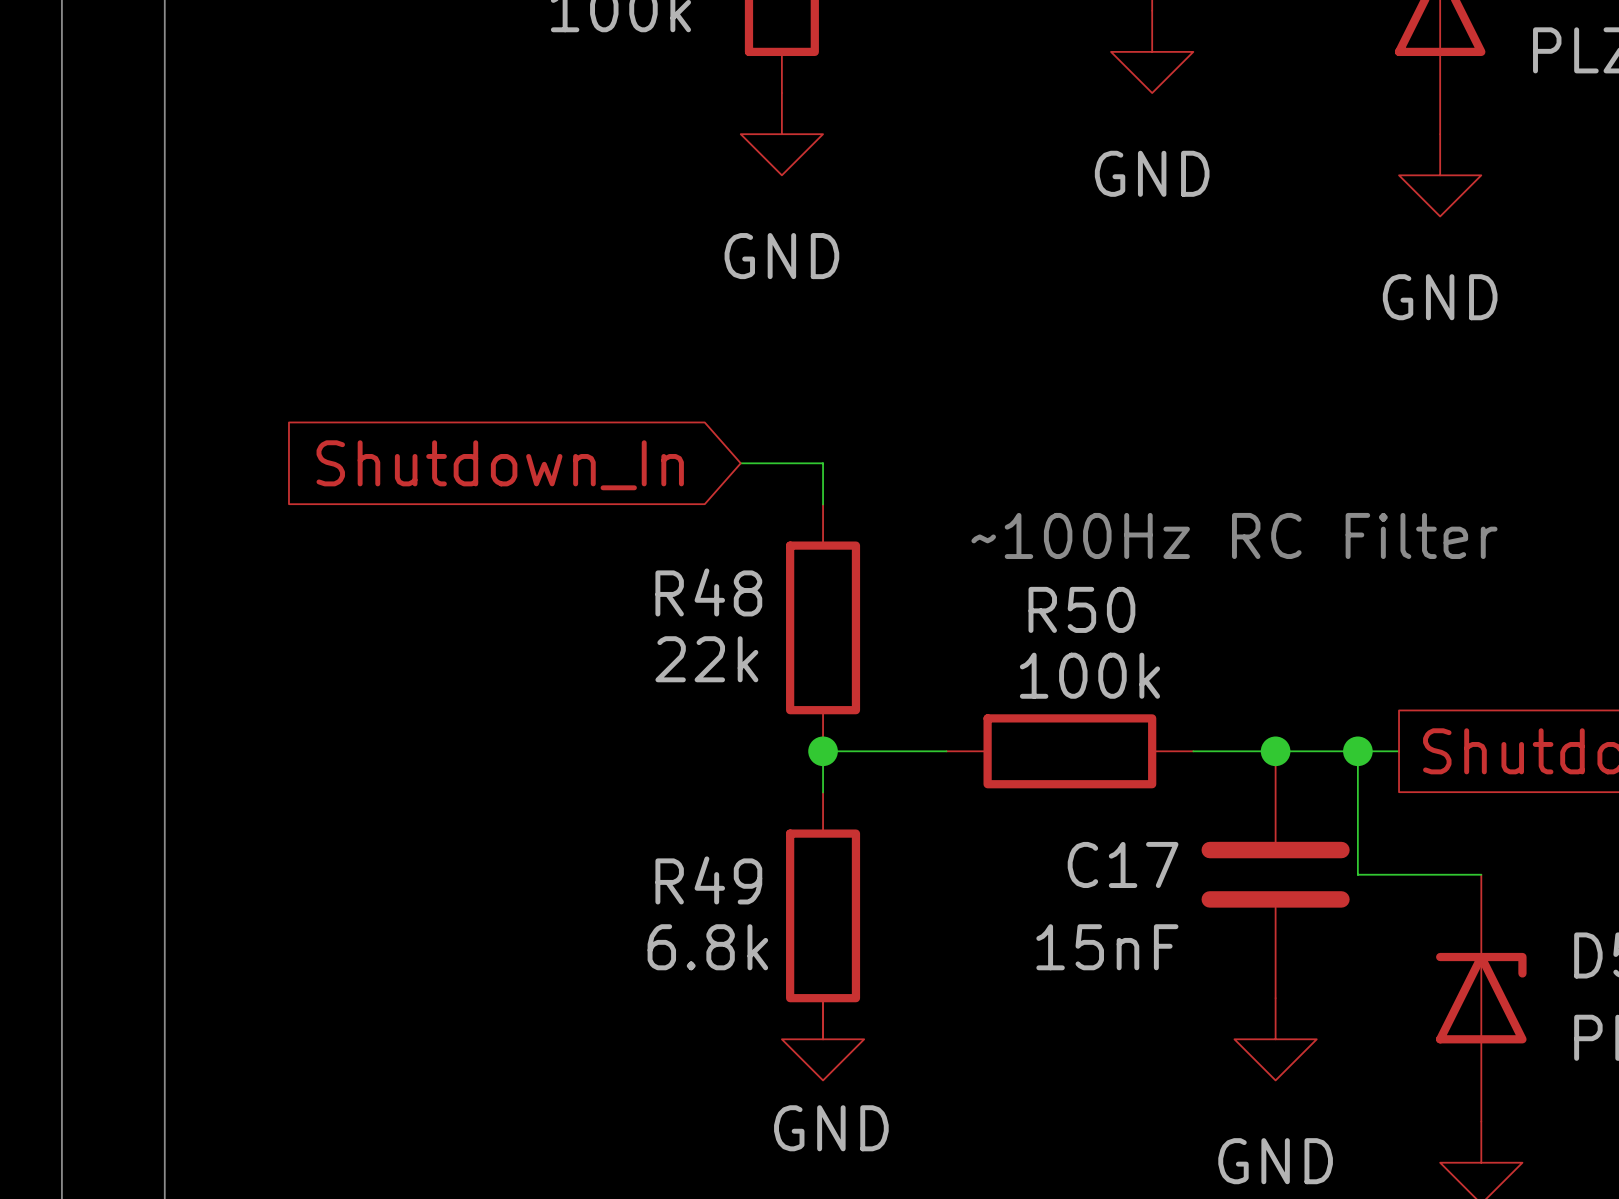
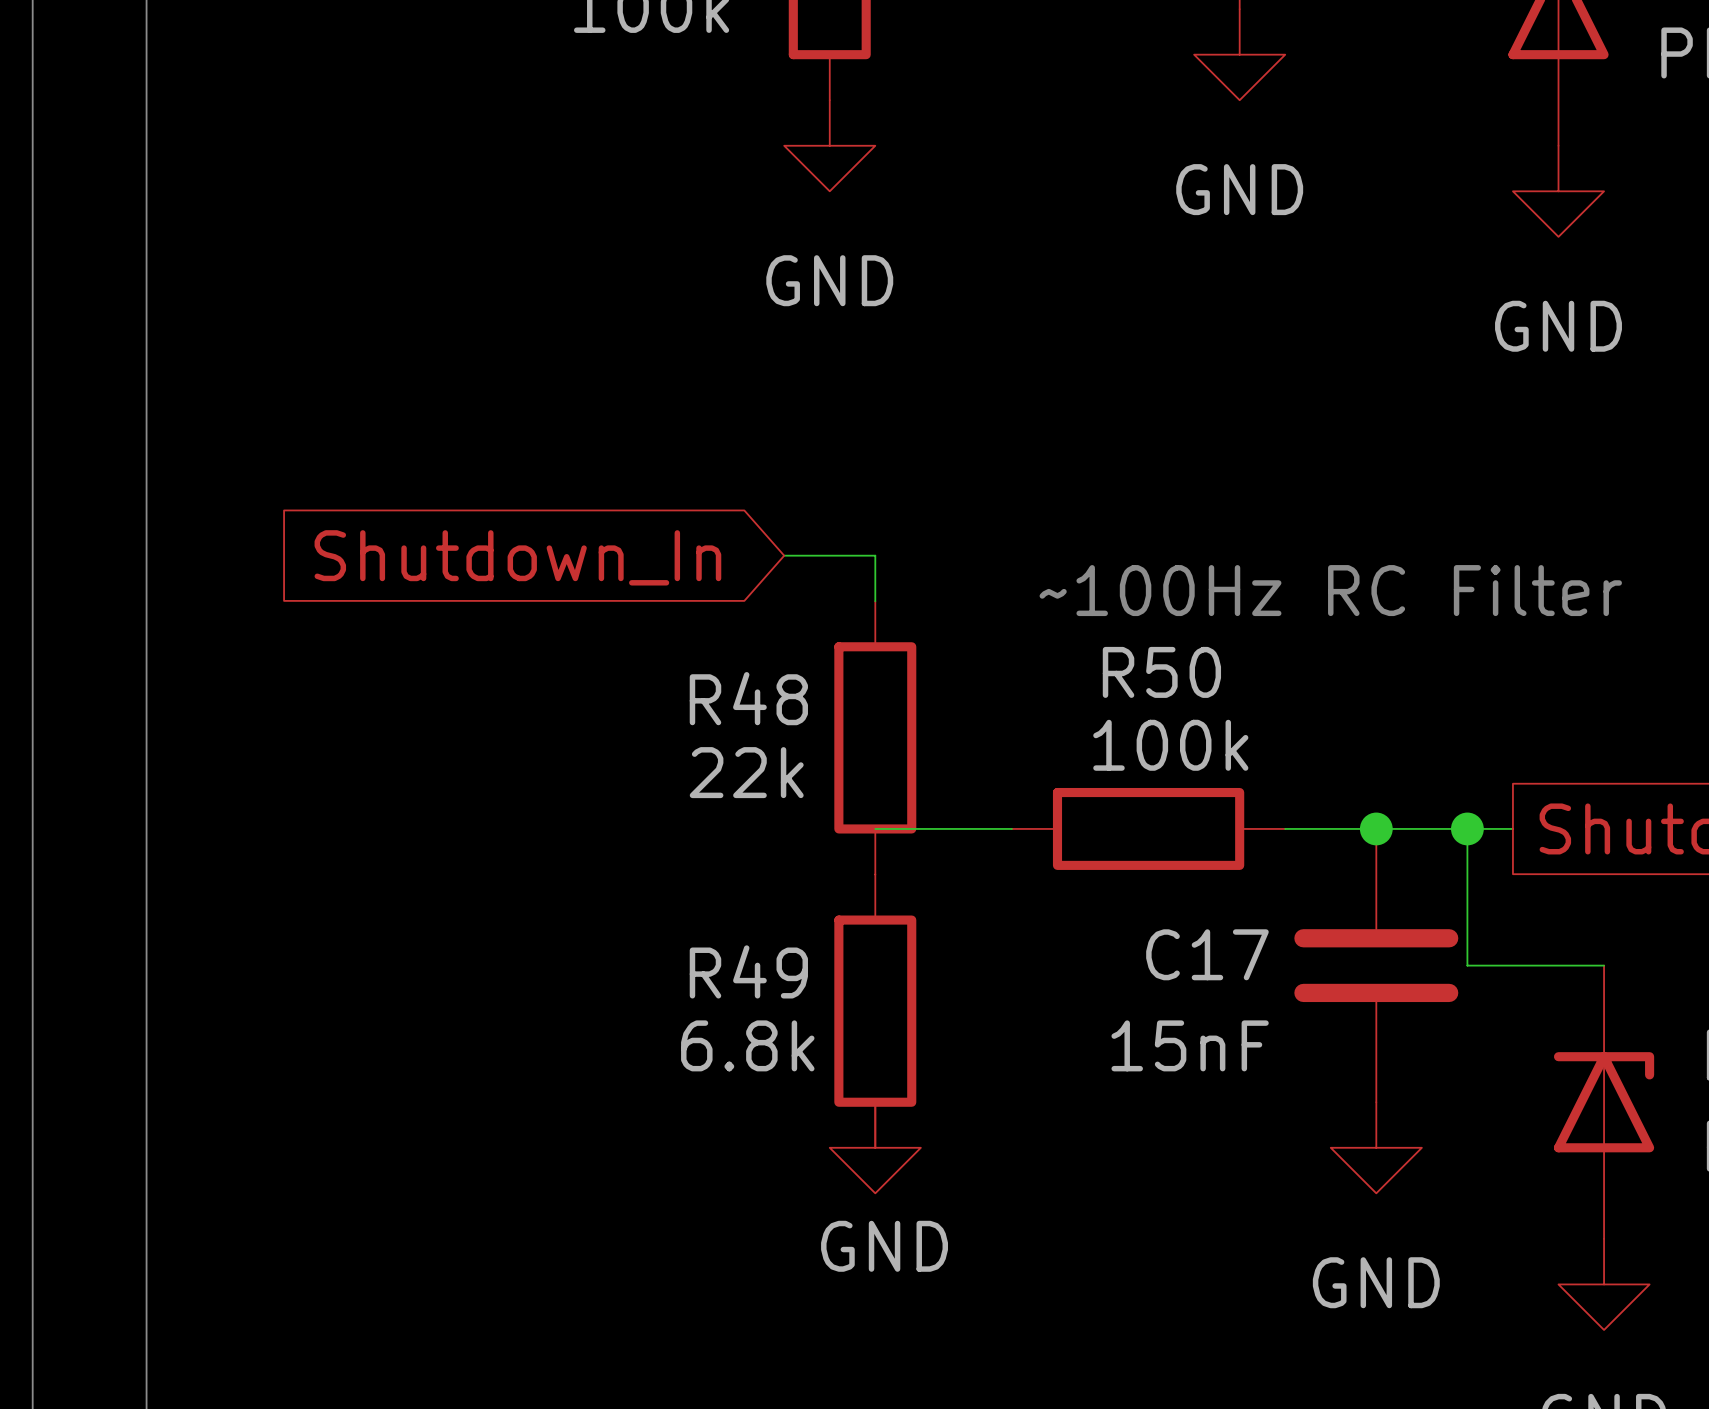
wire: (740, 463) (823, 463) (823, 504) -> (784, 555) (875, 555) (875, 601)
global label position: Shutdown_In (500, 465) -> Shutdown_In (517, 557)
R48 position: (823, 627) -> (875, 737)
junction: (823, 751) -> none

